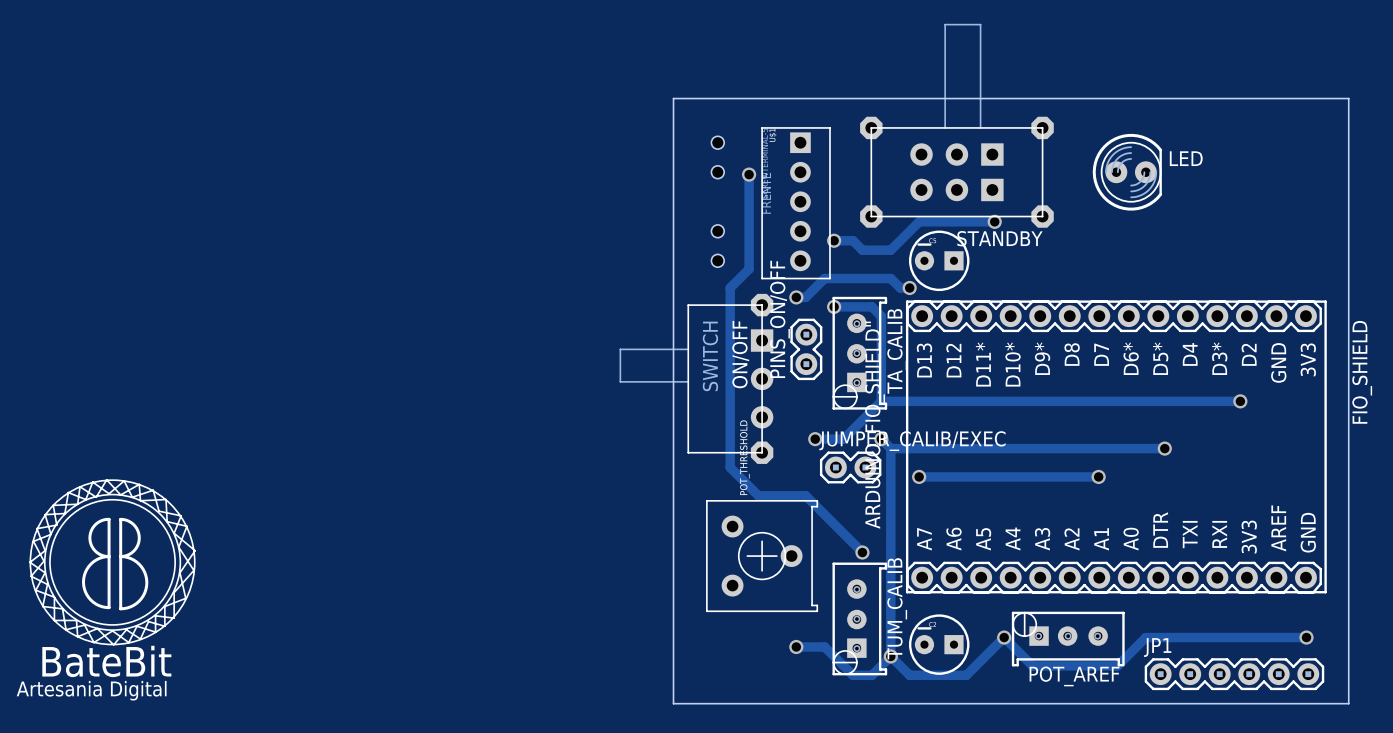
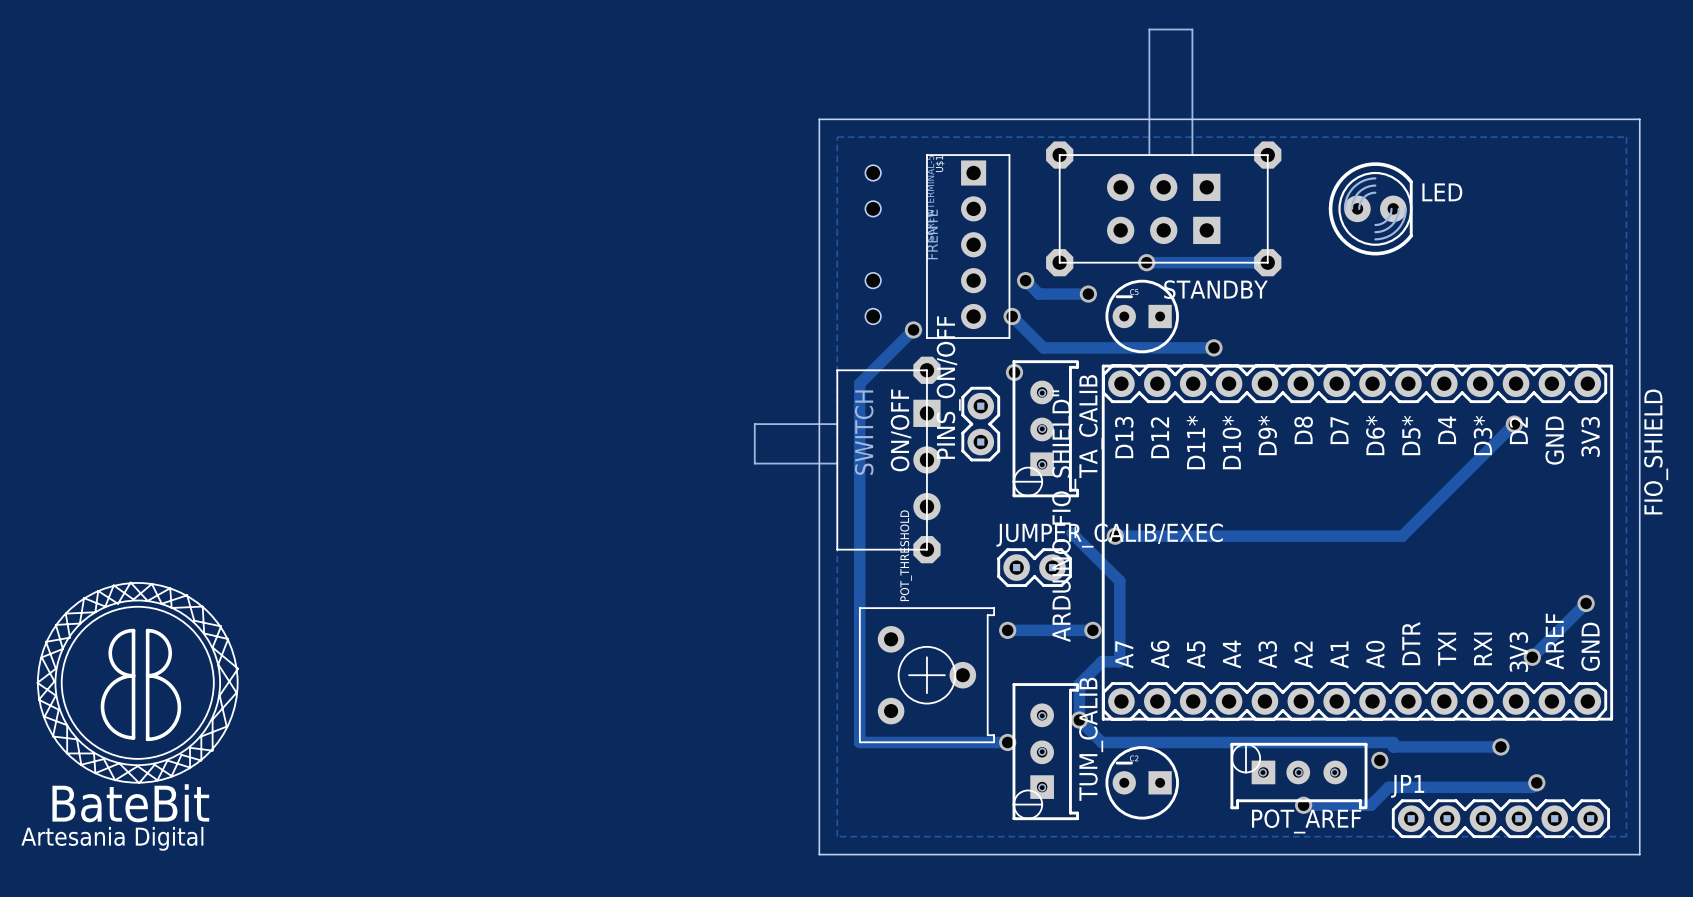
zone outline: none -> (837, 137) (1626, 137) (1626, 836) (837, 836) (837, 137)
track: (749, 174) (749, 269) (730, 287) (730, 467) (758, 495) (805, 495) (862, 552) -> none
via: (749, 174) -> none
track: none -> (1146, 262) (1267, 262)
via: none -> (1146, 262)
track: (994, 221) (919, 221) (890, 250) (862, 250) (853, 240) (834, 240) -> none
via: (994, 221) -> none
track: none -> (1025, 280) (1039, 294) (1088, 294)
via: none -> (1025, 280)
via: (834, 240) -> none
via: none -> (1088, 294)
track: none -> (1012, 316) (1043, 347) (1213, 347)
via: none -> (1012, 316)
track: none -> (913, 329) (859, 383) (859, 742) (1007, 742)
via: none -> (913, 329)
via: none -> (1213, 347)
track: (909, 287) (900, 287) (890, 278) (824, 278) (805, 297) (796, 297) -> none
via: (909, 287) -> none
via: (796, 297) -> none
track: (834, 306) (871, 306) (881, 316) (881, 401) -> none
track: none -> (1514, 424) (1402, 536) (1115, 536)
track: (881, 401) (843, 439) (815, 439) -> none
track: (881, 401) (1240, 401) -> none
via position: (1240, 401) -> (1514, 424)
via: (815, 439) -> none
via: (881, 439) -> none
via: none -> (1115, 536)
track: none -> (1083, 544) (1119, 581) (1119, 661) (1101, 661) (1079, 684) (1079, 720) (1101, 742) (1393, 742) (1393, 746) (1500, 746)
track: (1164, 448) (890, 448) (890, 656) -> none
via: (1164, 448) -> none
track: (919, 476) (1098, 476) -> none
via: (919, 476) -> none
via: (1098, 476) -> none
track: none -> (1586, 603) (1532, 657)
via: none -> (1586, 603)
track: none -> (1007, 630) (1092, 630)
via: none -> (1007, 630)
via: none -> (1092, 630)
via: none -> (1532, 657)
via: (862, 552) -> none
via: none -> (1079, 720)
via: none -> (1007, 742)
via: none -> (1500, 746)
via: none -> (1379, 760)
via: (1004, 637) -> none
track: (1306, 637) (1145, 637) (1117, 665) (1032, 665) (1004, 637) (966, 675) (909, 675) (890, 656) -> none
via: (1306, 637) -> none
track: none -> (1536, 782) (1532, 787) (1388, 787) (1370, 805) (1303, 805)
via: none -> (1536, 782)
track: (796, 646) (824, 646) (853, 675) (871, 675) (890, 656) -> none
via: (796, 646) -> none
via: (890, 656) -> none
via: none -> (1303, 805)

